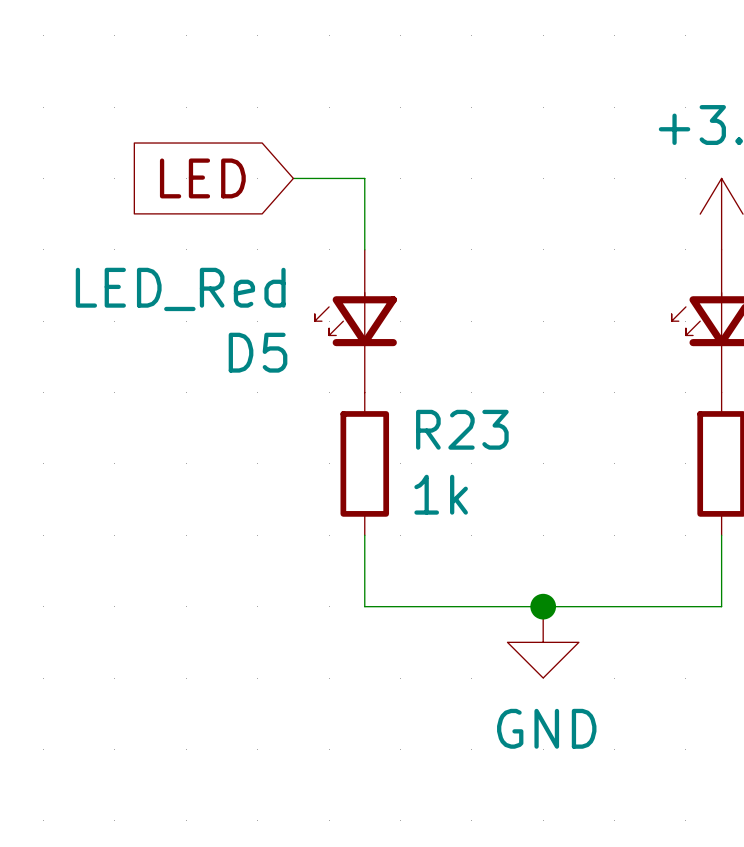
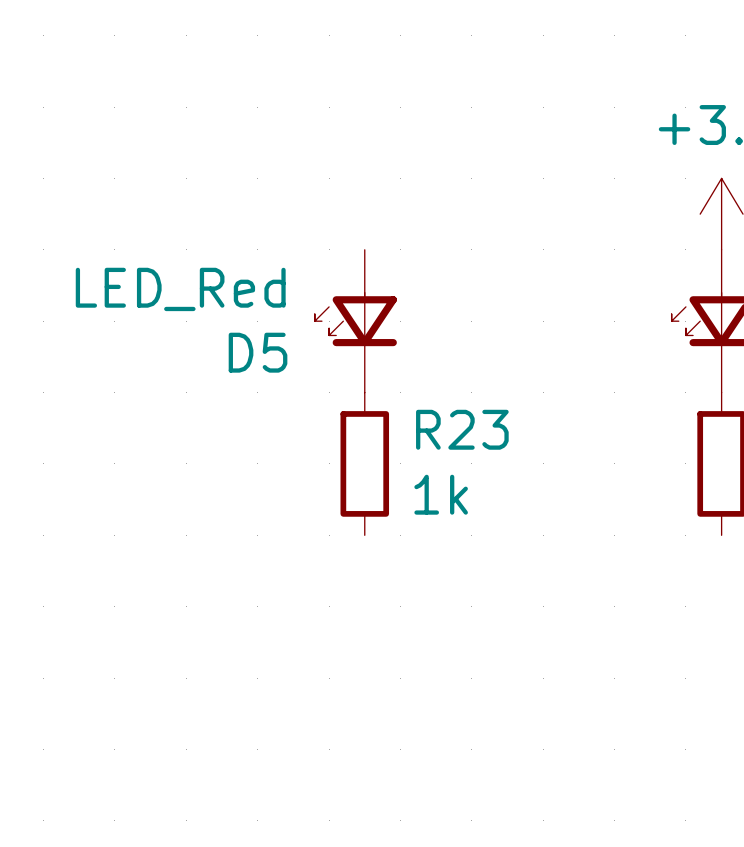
global label: LED (202, 178) -> none
wire: (293, 178) (364, 178) (364, 249) -> none
wire: (364, 535) (364, 606) (721, 606) (721, 535) -> none
junction: (543, 606) -> none
power symbol: GND (543, 642) -> none

